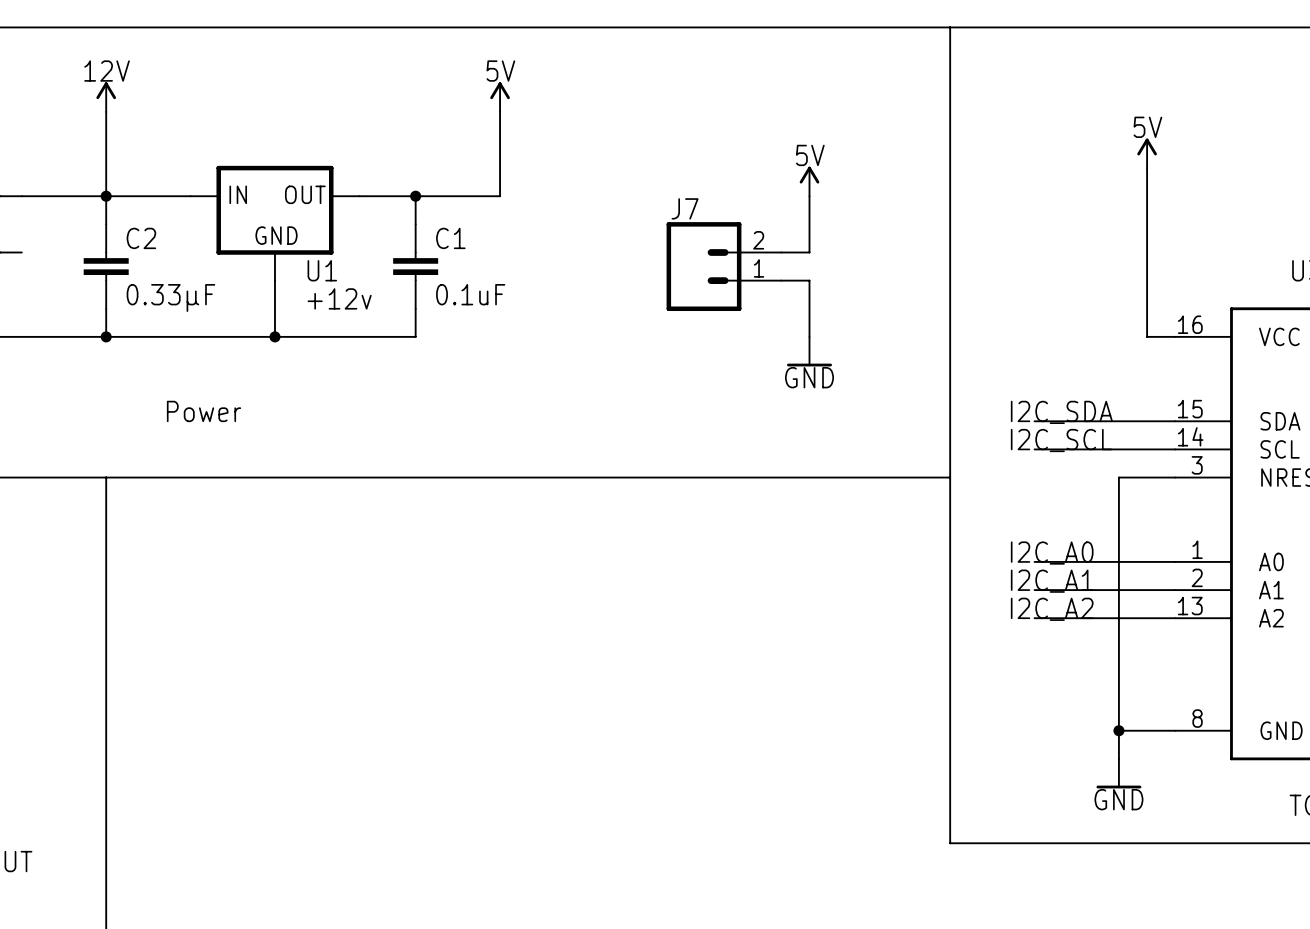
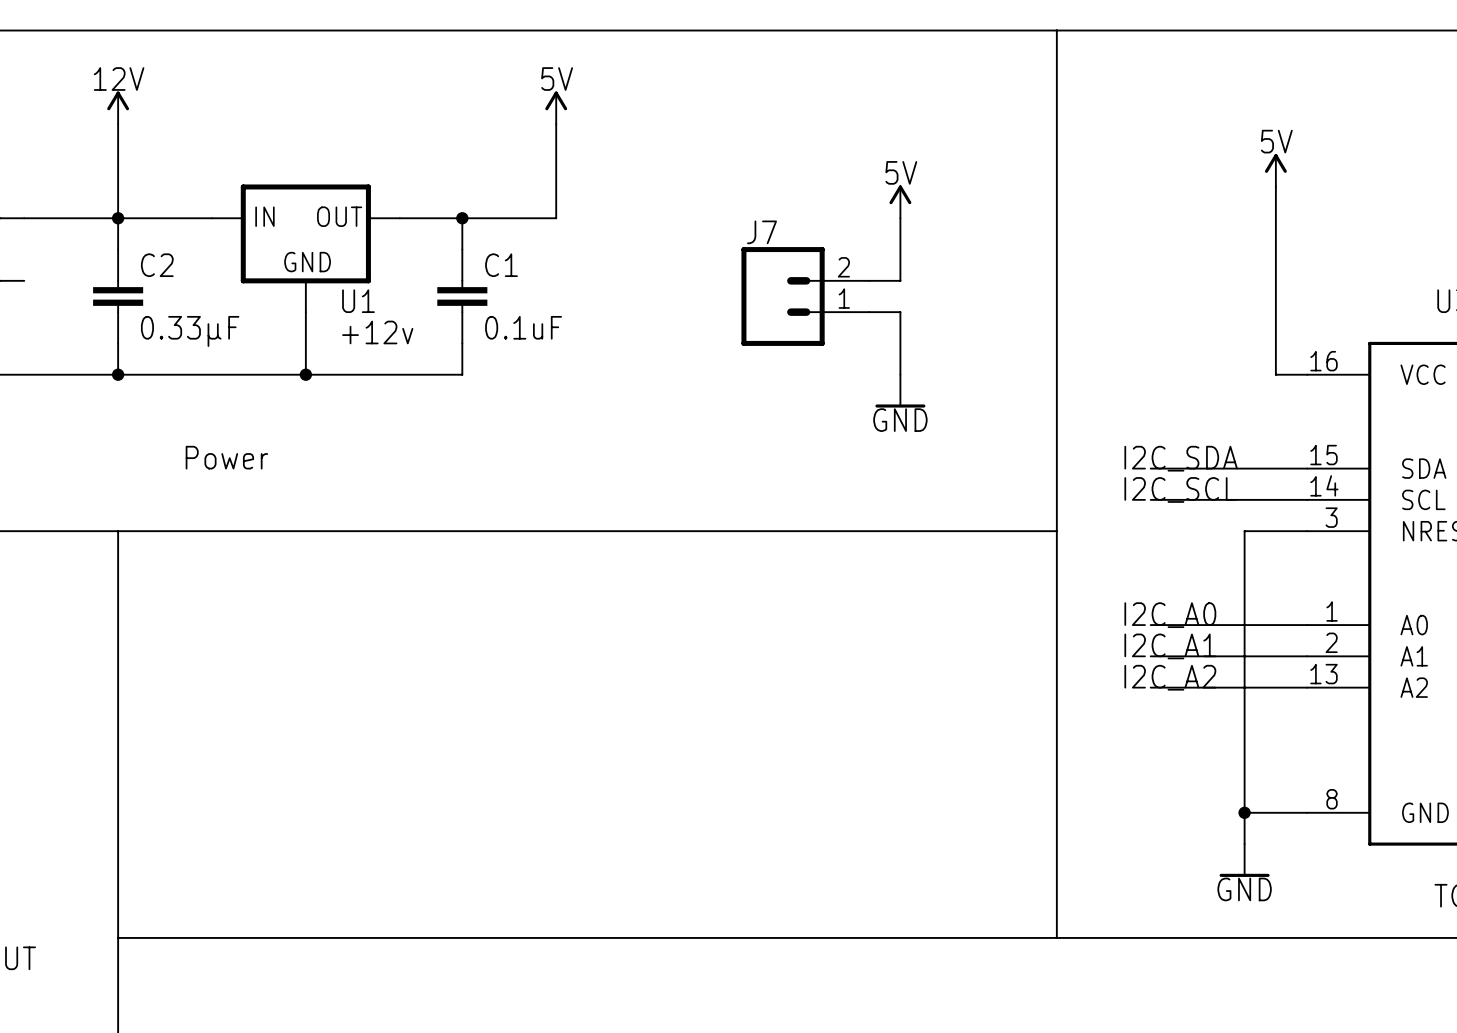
line: none -> (118, 937) (1056, 937)

